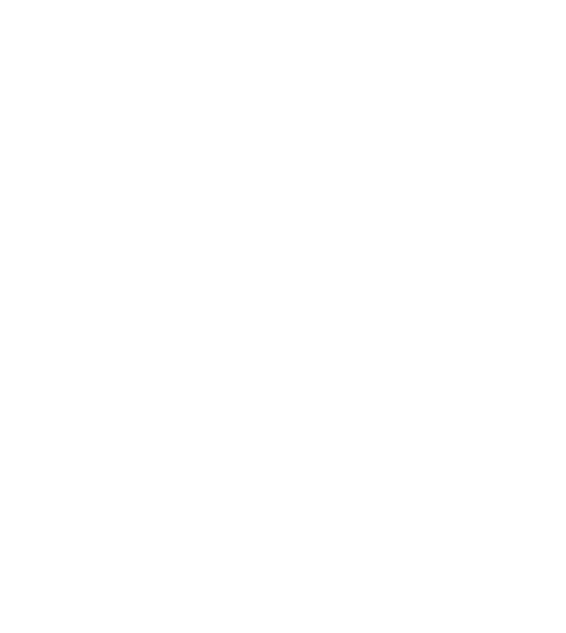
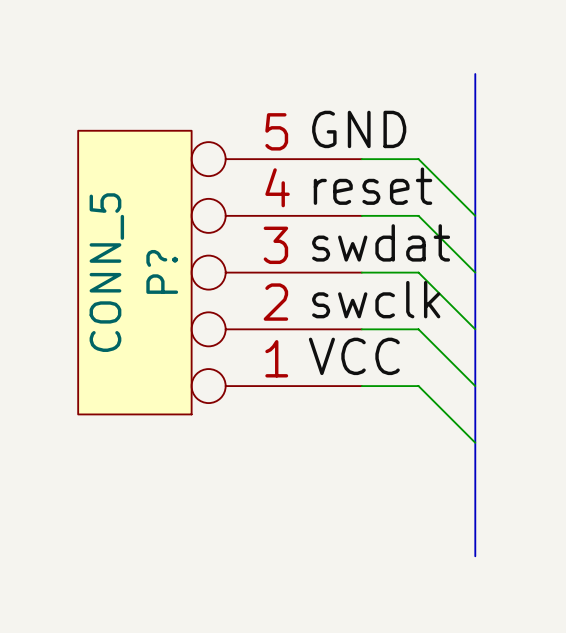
bus: none -> (475, 74) (475, 556)
label: none -> GND (359, 129)
wire: none -> (361, 159) (418, 159) (475, 215)
label: none -> reset (372, 186)
wire: none -> (361, 215) (418, 215) (475, 272)
label: none -> swdat (381, 242)
P?: none -> CONN_5 (219, 272)
wire: none -> (361, 272) (418, 272) (475, 329)
label: none -> swclk (376, 299)
wire: none -> (361, 329) (418, 329) (475, 386)
label: none -> VCC (354, 356)
wire: none -> (361, 386) (418, 386) (475, 442)

